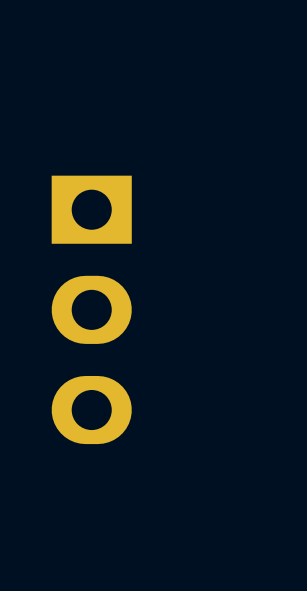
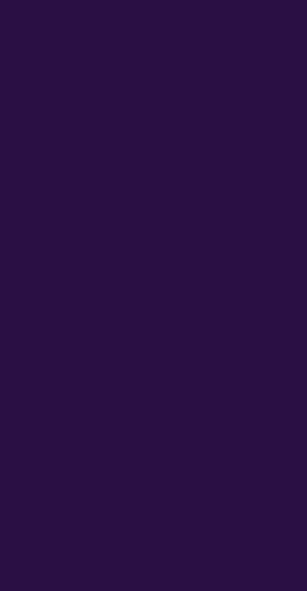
part: (91, 309) -> none

